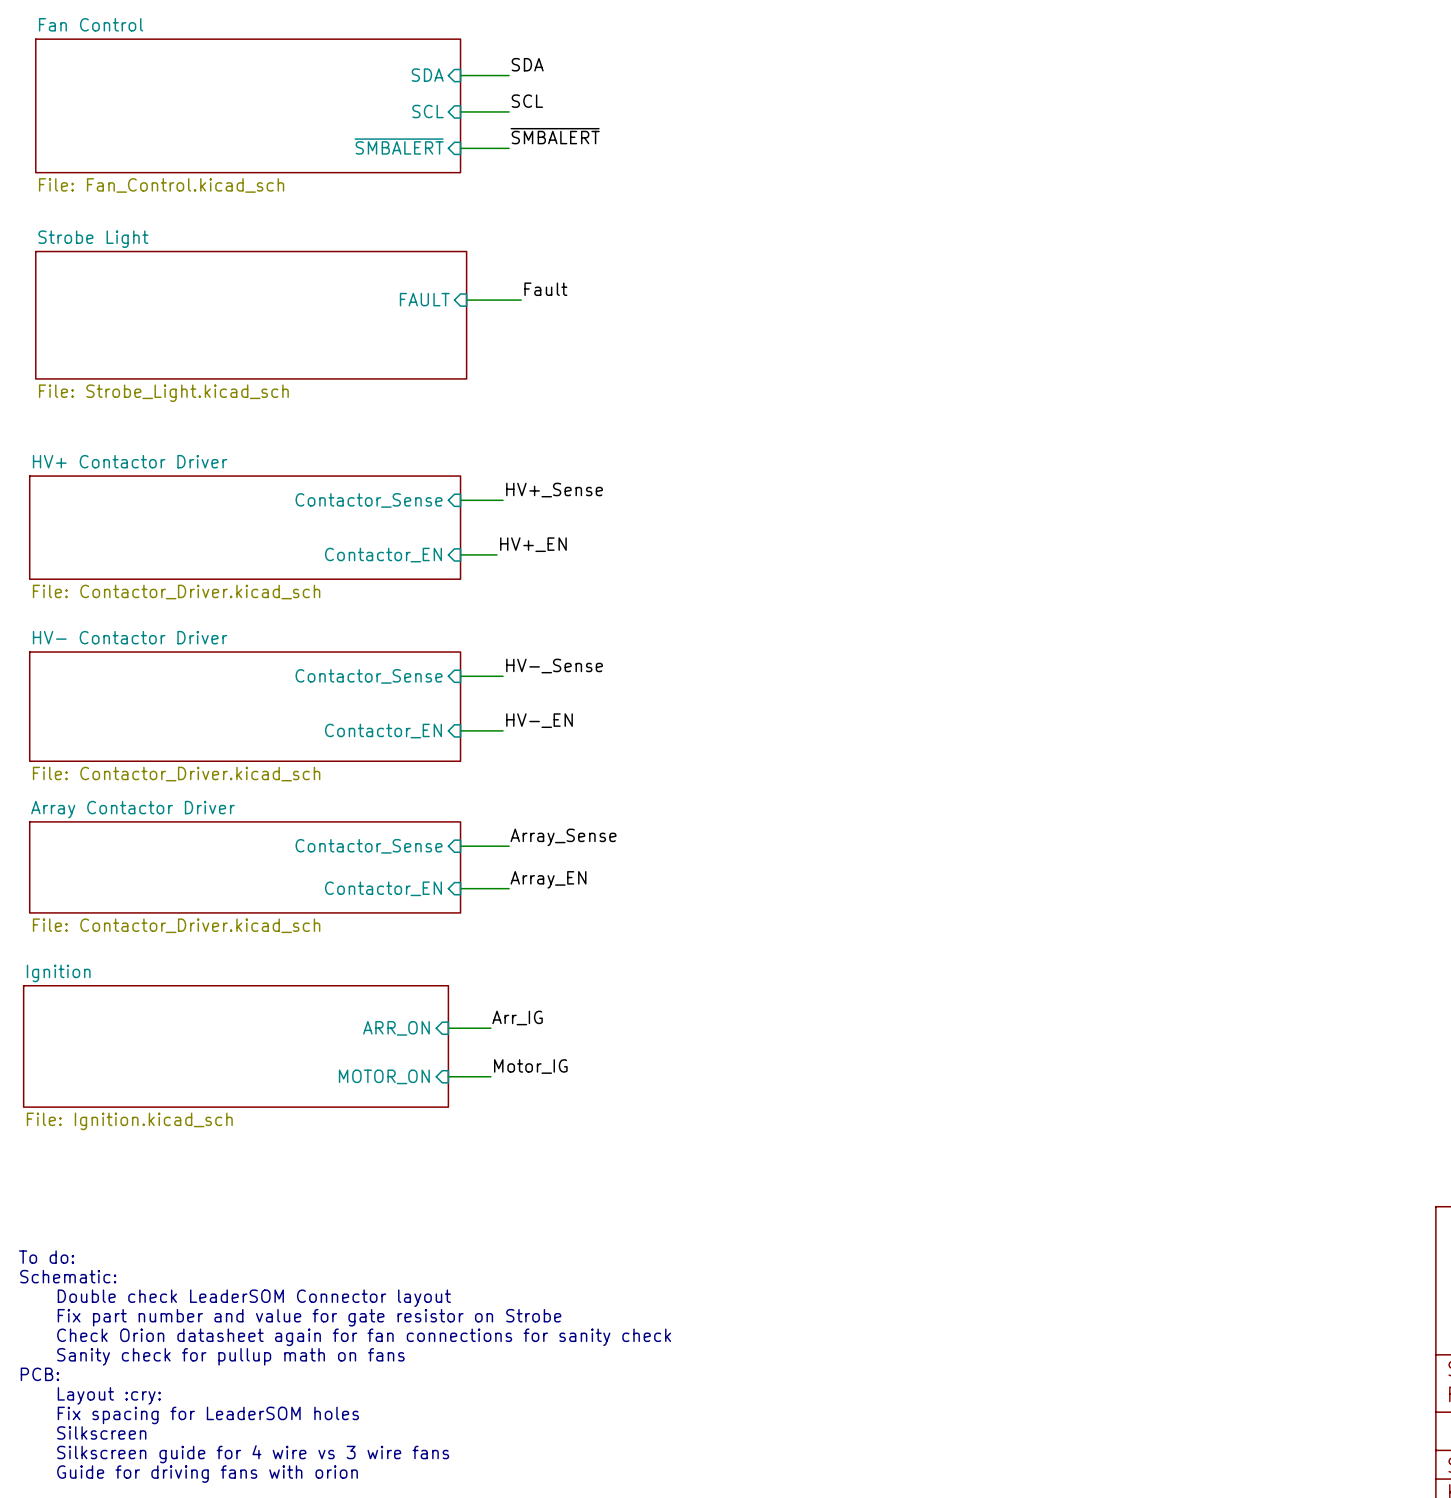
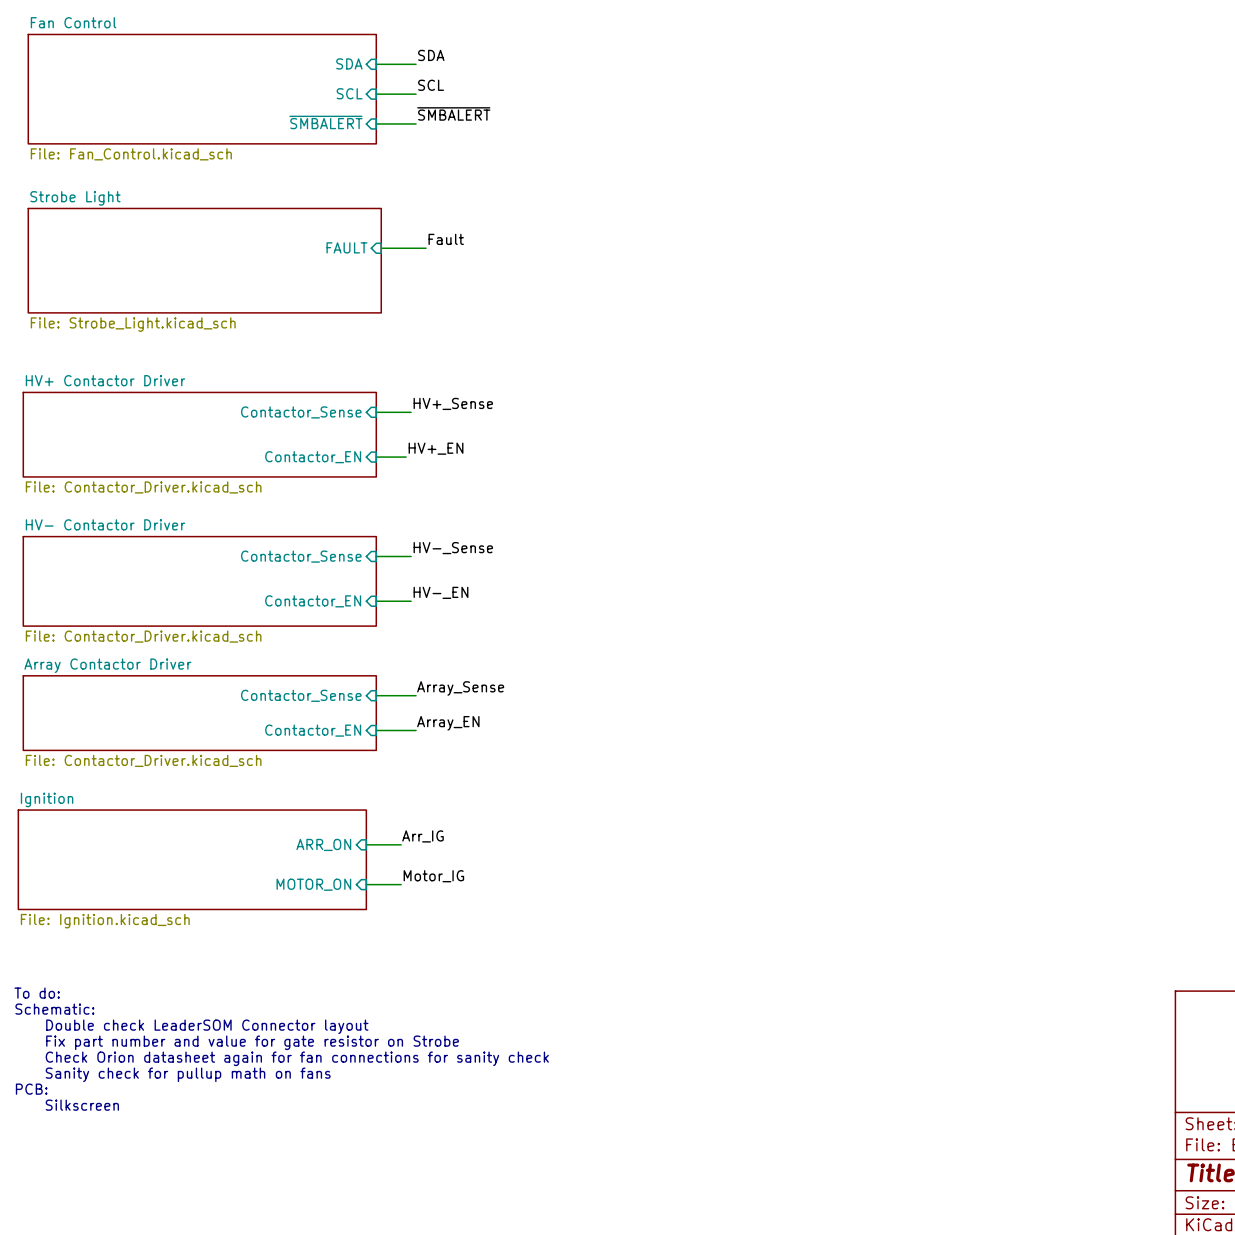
text position: To do: (46, 1257) -> To do: (37, 993)
text position: Schematic: (68, 1276) -> Schematic: (54, 1009)
text position: Double check LeaderSOM Connector layout (254, 1298) -> Double check LeaderSOM Connector layout (207, 1026)
text position: Fix part number and value for gate resistor on Strobe (309, 1317) -> Fix part number and value for gate resistor on Strobe (252, 1042)
text position: Check Orion datasheet again for fan connections for sanity check (364, 1337) -> Check Orion datasheet again for fan connections for sanity check (297, 1058)
text position: Sanity check for pullup math on fans (230, 1356) -> Sanity check for pullup math on fans (188, 1074)
text position: PCB: (39, 1374) -> PCB: (31, 1089)
text: Layout :cry: (109, 1395) -> none
text: Fix spacing for LeaderSOM holes (208, 1415) -> none
text position: Silkscreen (101, 1432) -> Silkscreen (82, 1105)
text: Silkscreen guide for 4 wire vs 3 wire fans (253, 1454) -> none
text: Guide for driving fans with orion (207, 1474) -> none

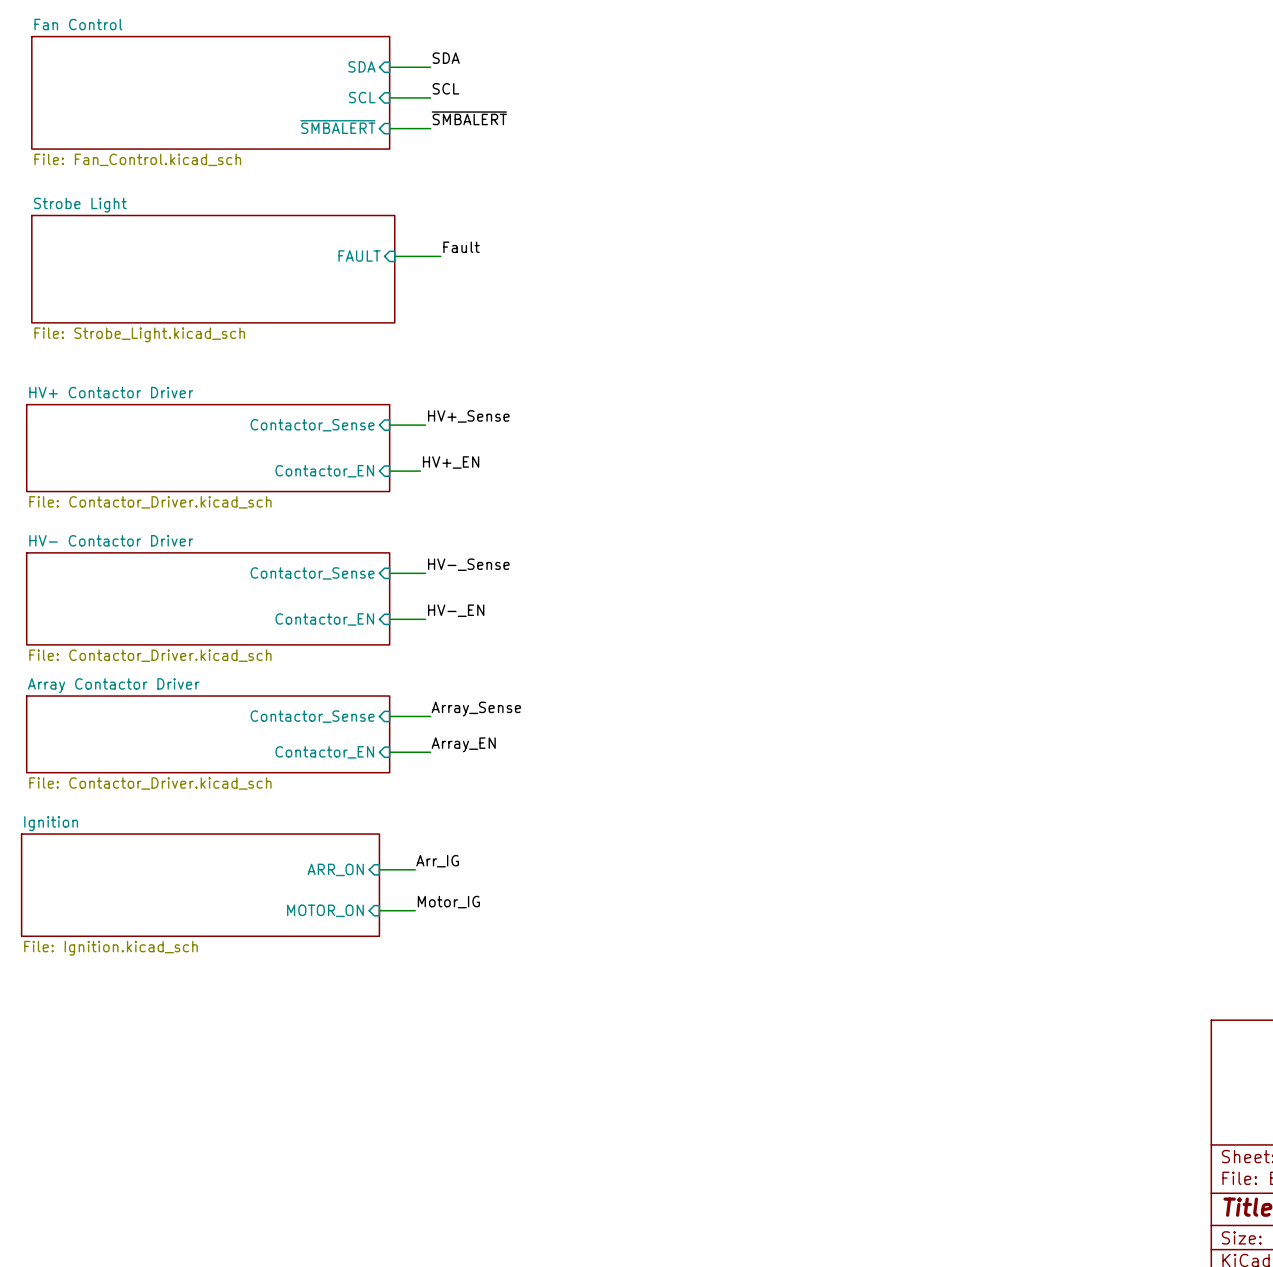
text: To do: (37, 993) -> none
text: Schematic: (54, 1009) -> none
text: Double check LeaderSOM Connector layout (207, 1026) -> none
text: Fix part number and value for gate resistor on Strobe (252, 1042) -> none
text: Check Orion datasheet again for fan connections for sanity check (297, 1058) -> none
text: Sanity check for pullup math on fans (188, 1074) -> none
text: PCB: (31, 1089) -> none
text: Silkscreen (82, 1105) -> none

